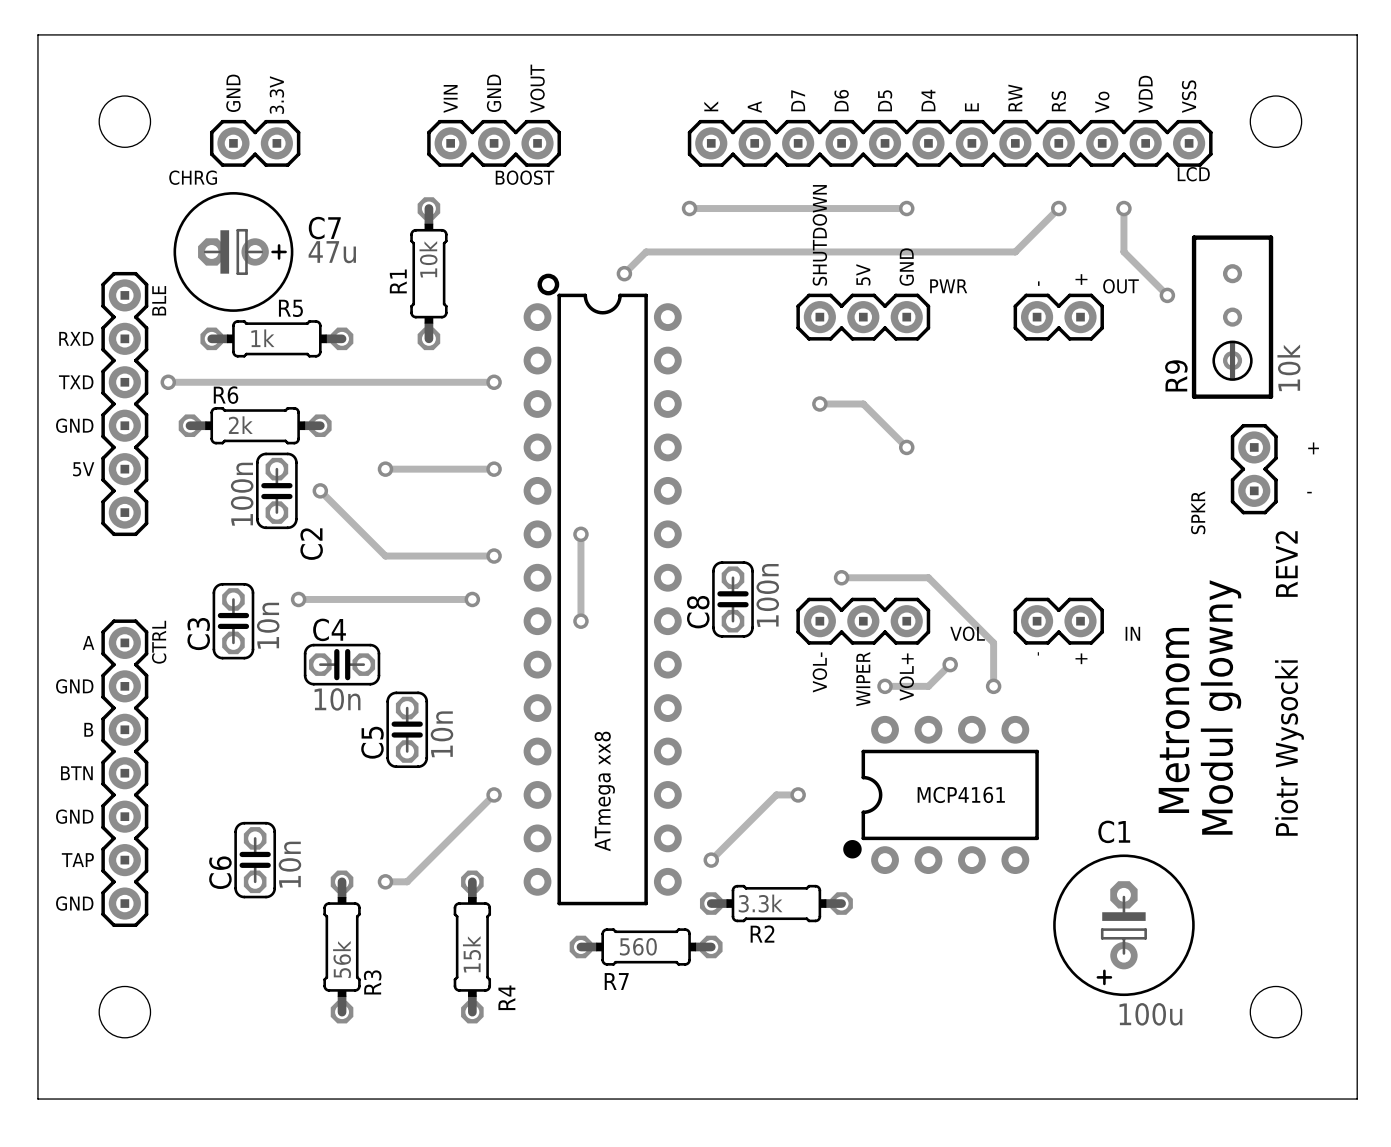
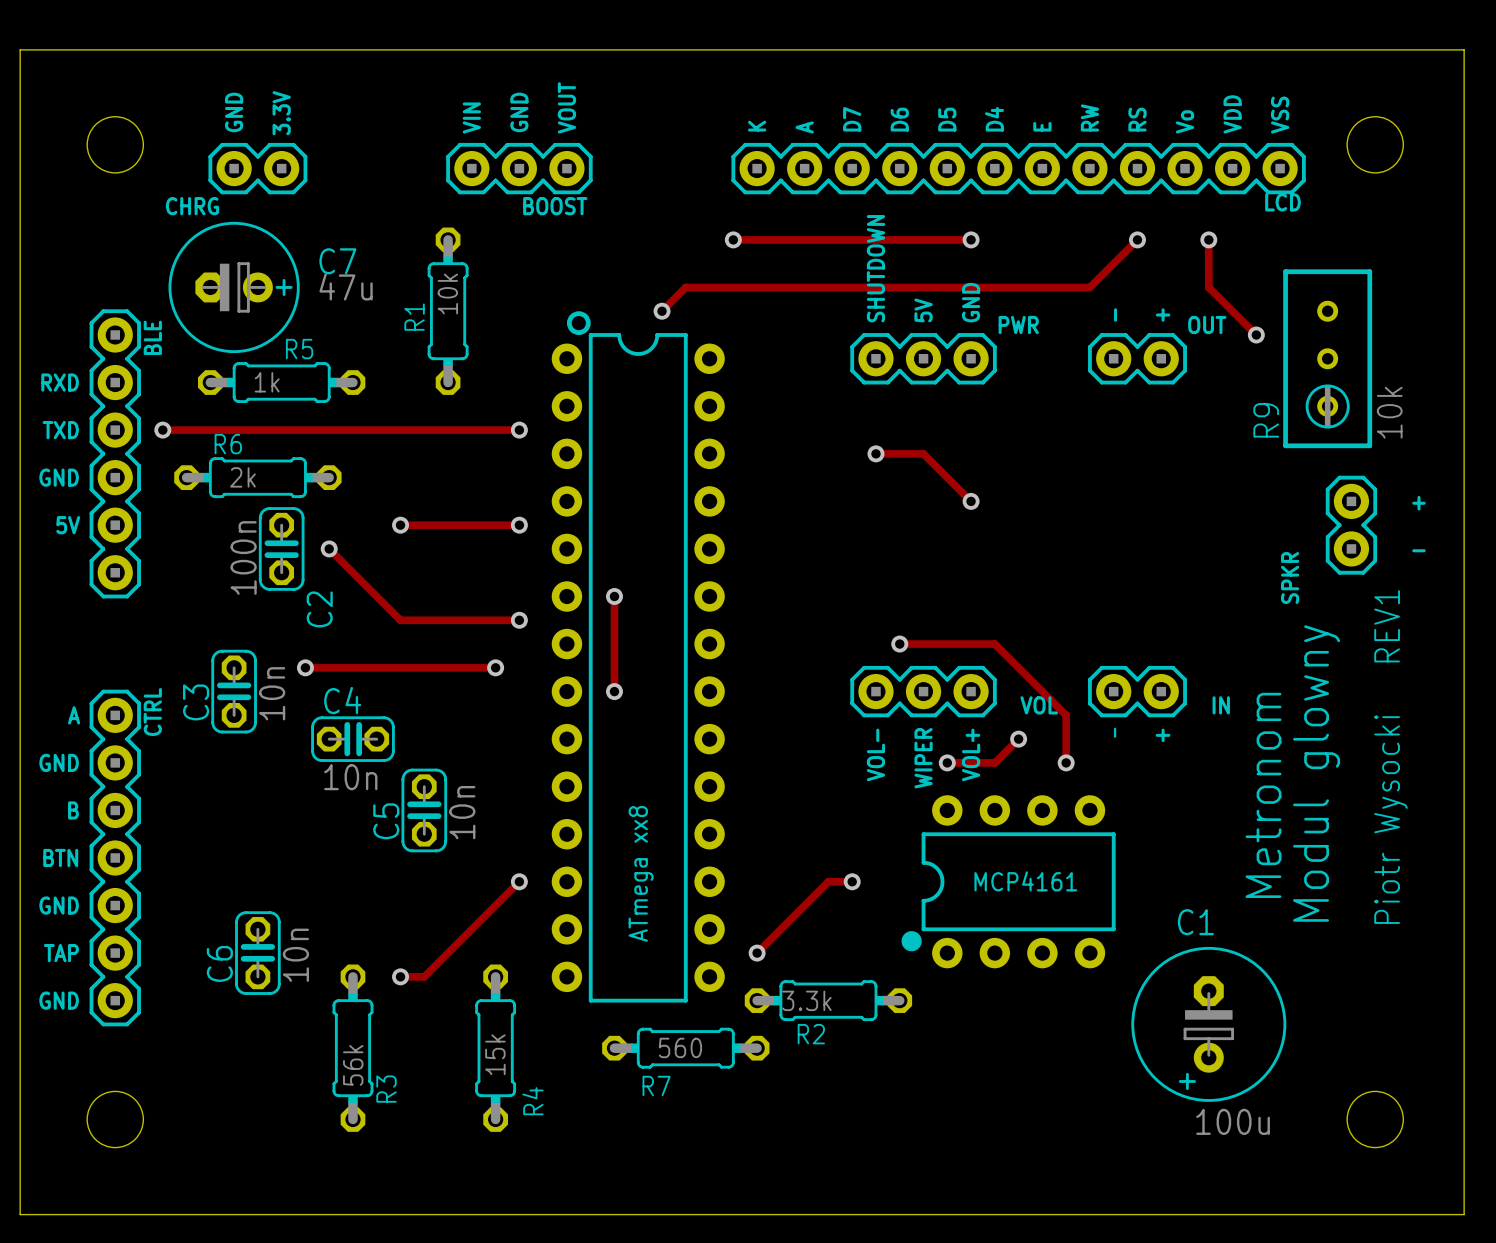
text: REV2 (1286, 564) -> REV1 (1387, 626)
C8: 100n (732, 599) -> none

